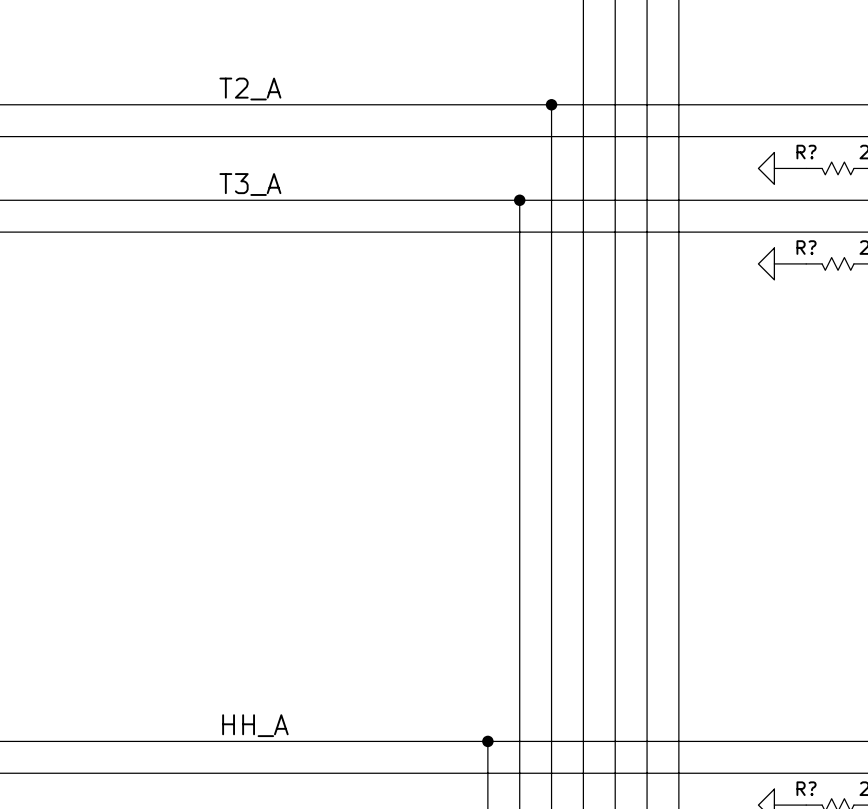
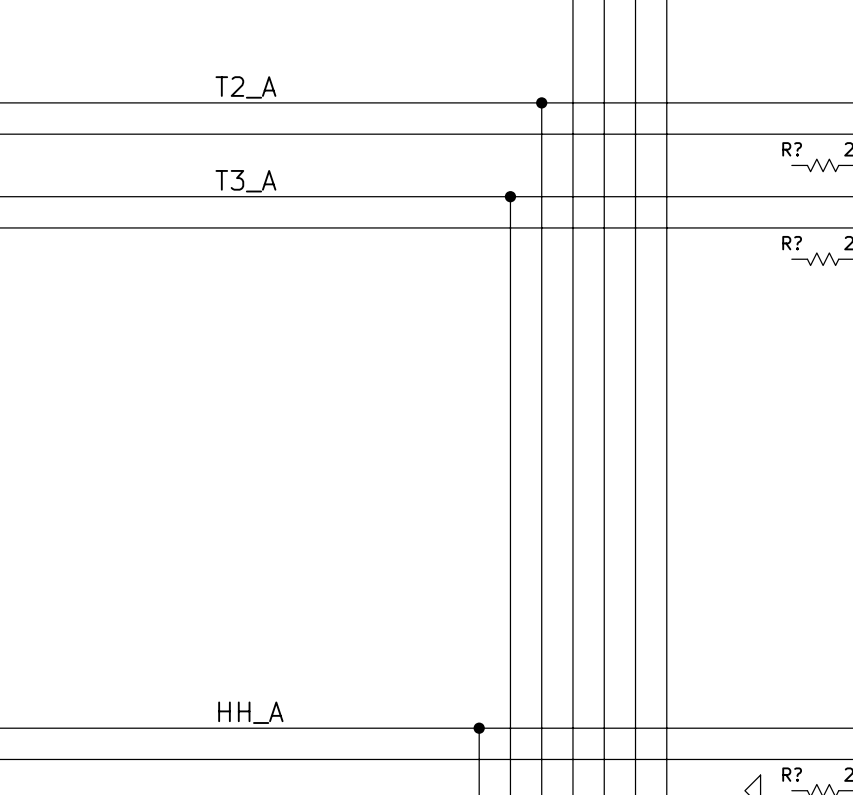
power symbol: (766, 168) -> none
wire: (774, 168) (806, 168) -> none
power symbol: (766, 263) -> none
wire: (774, 263) (806, 263) -> none
wire: (774, 805) (806, 805) -> none

